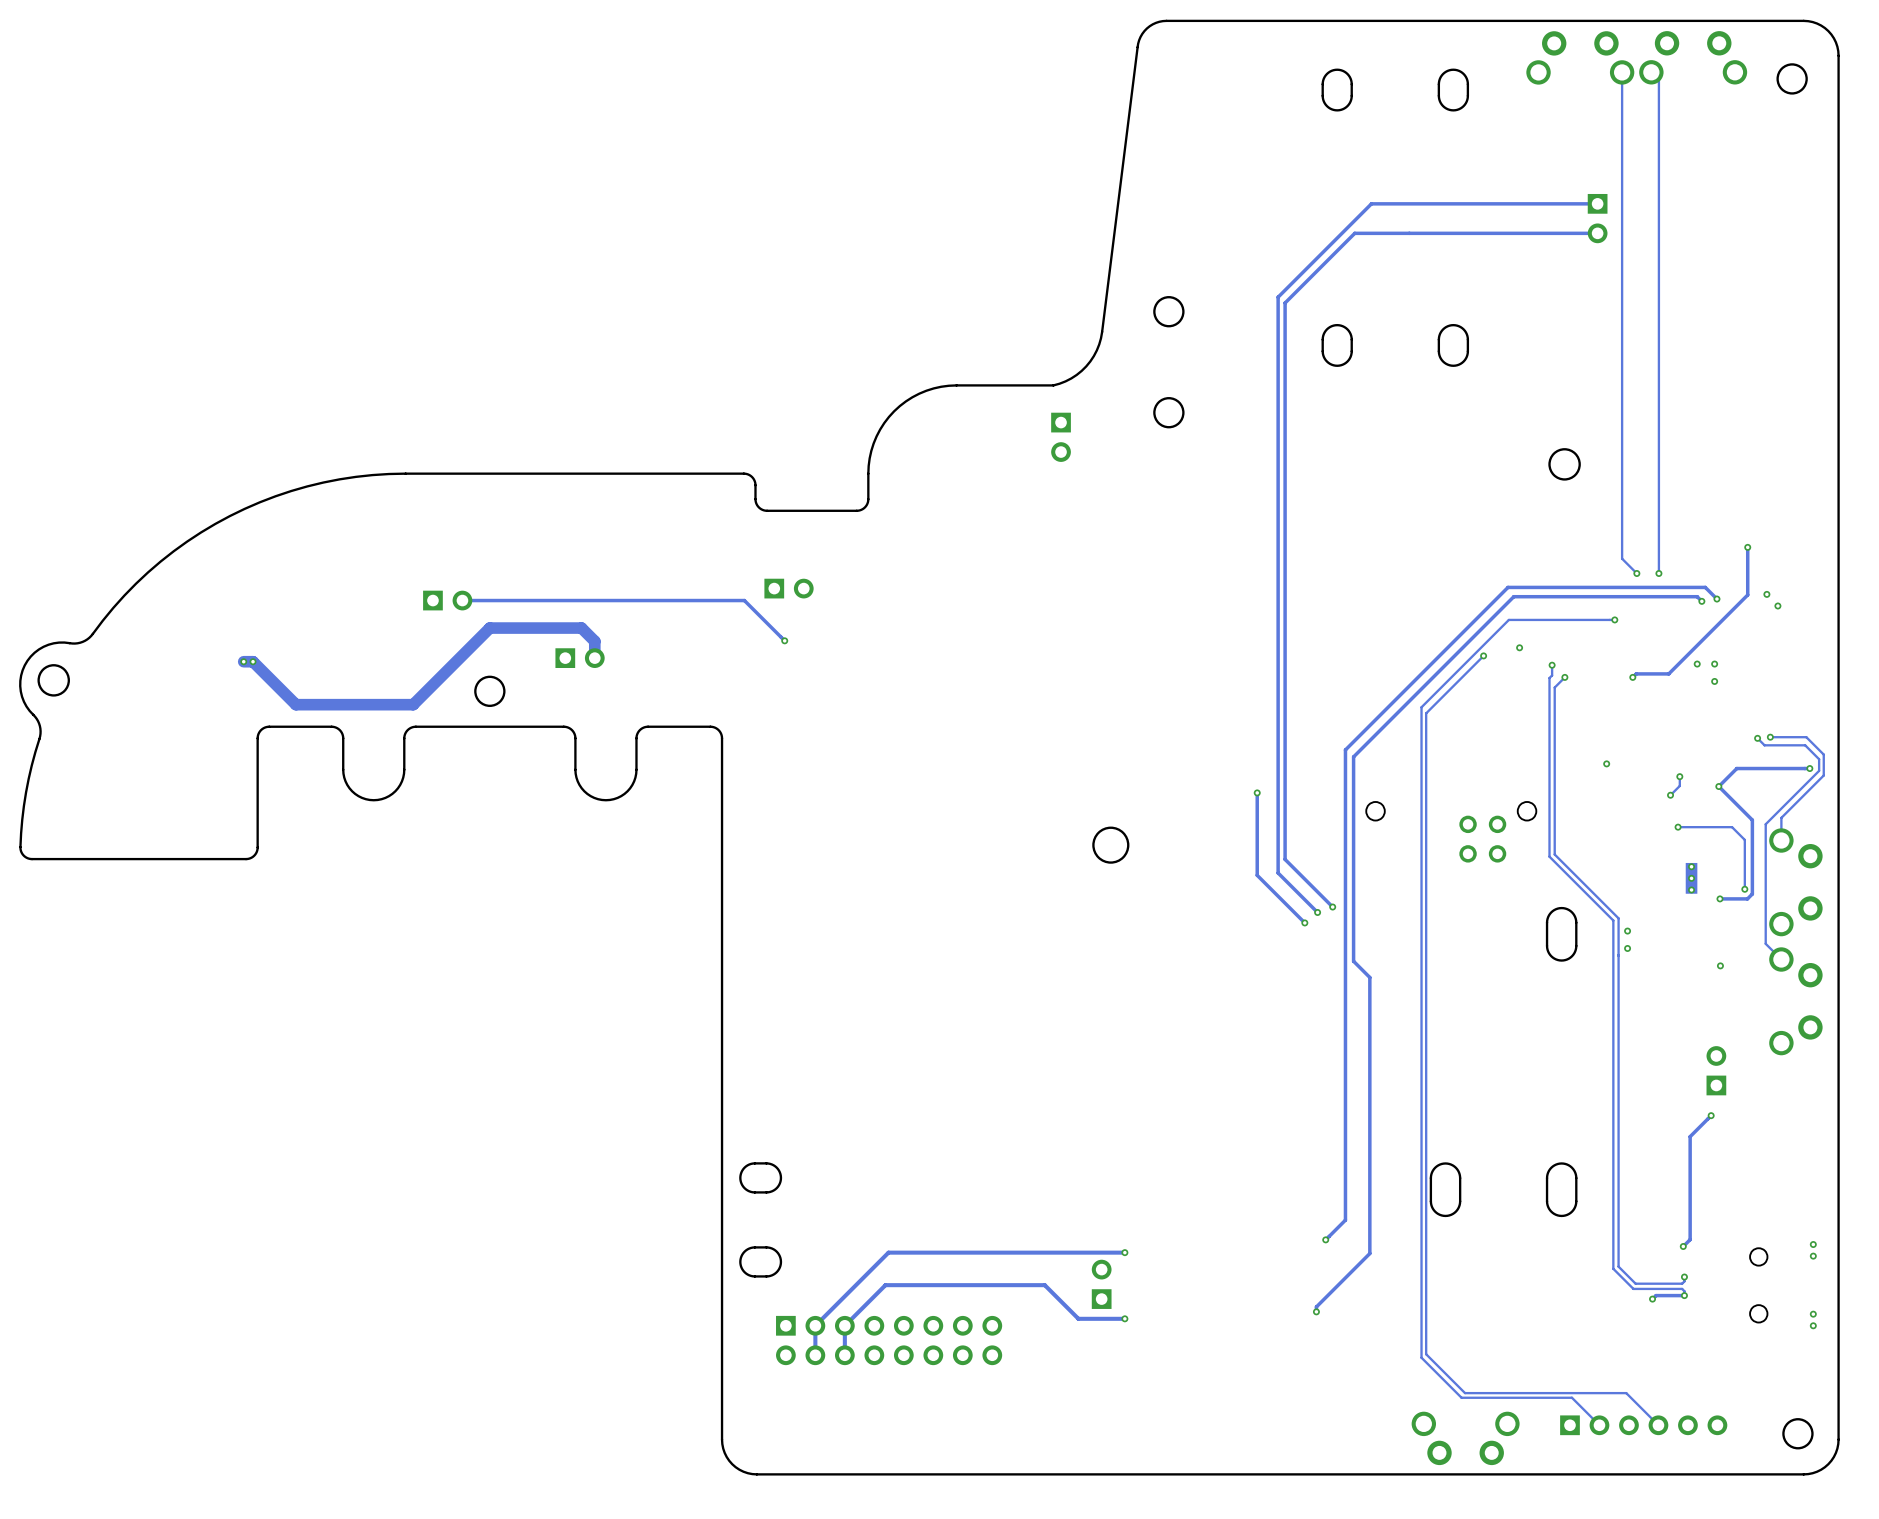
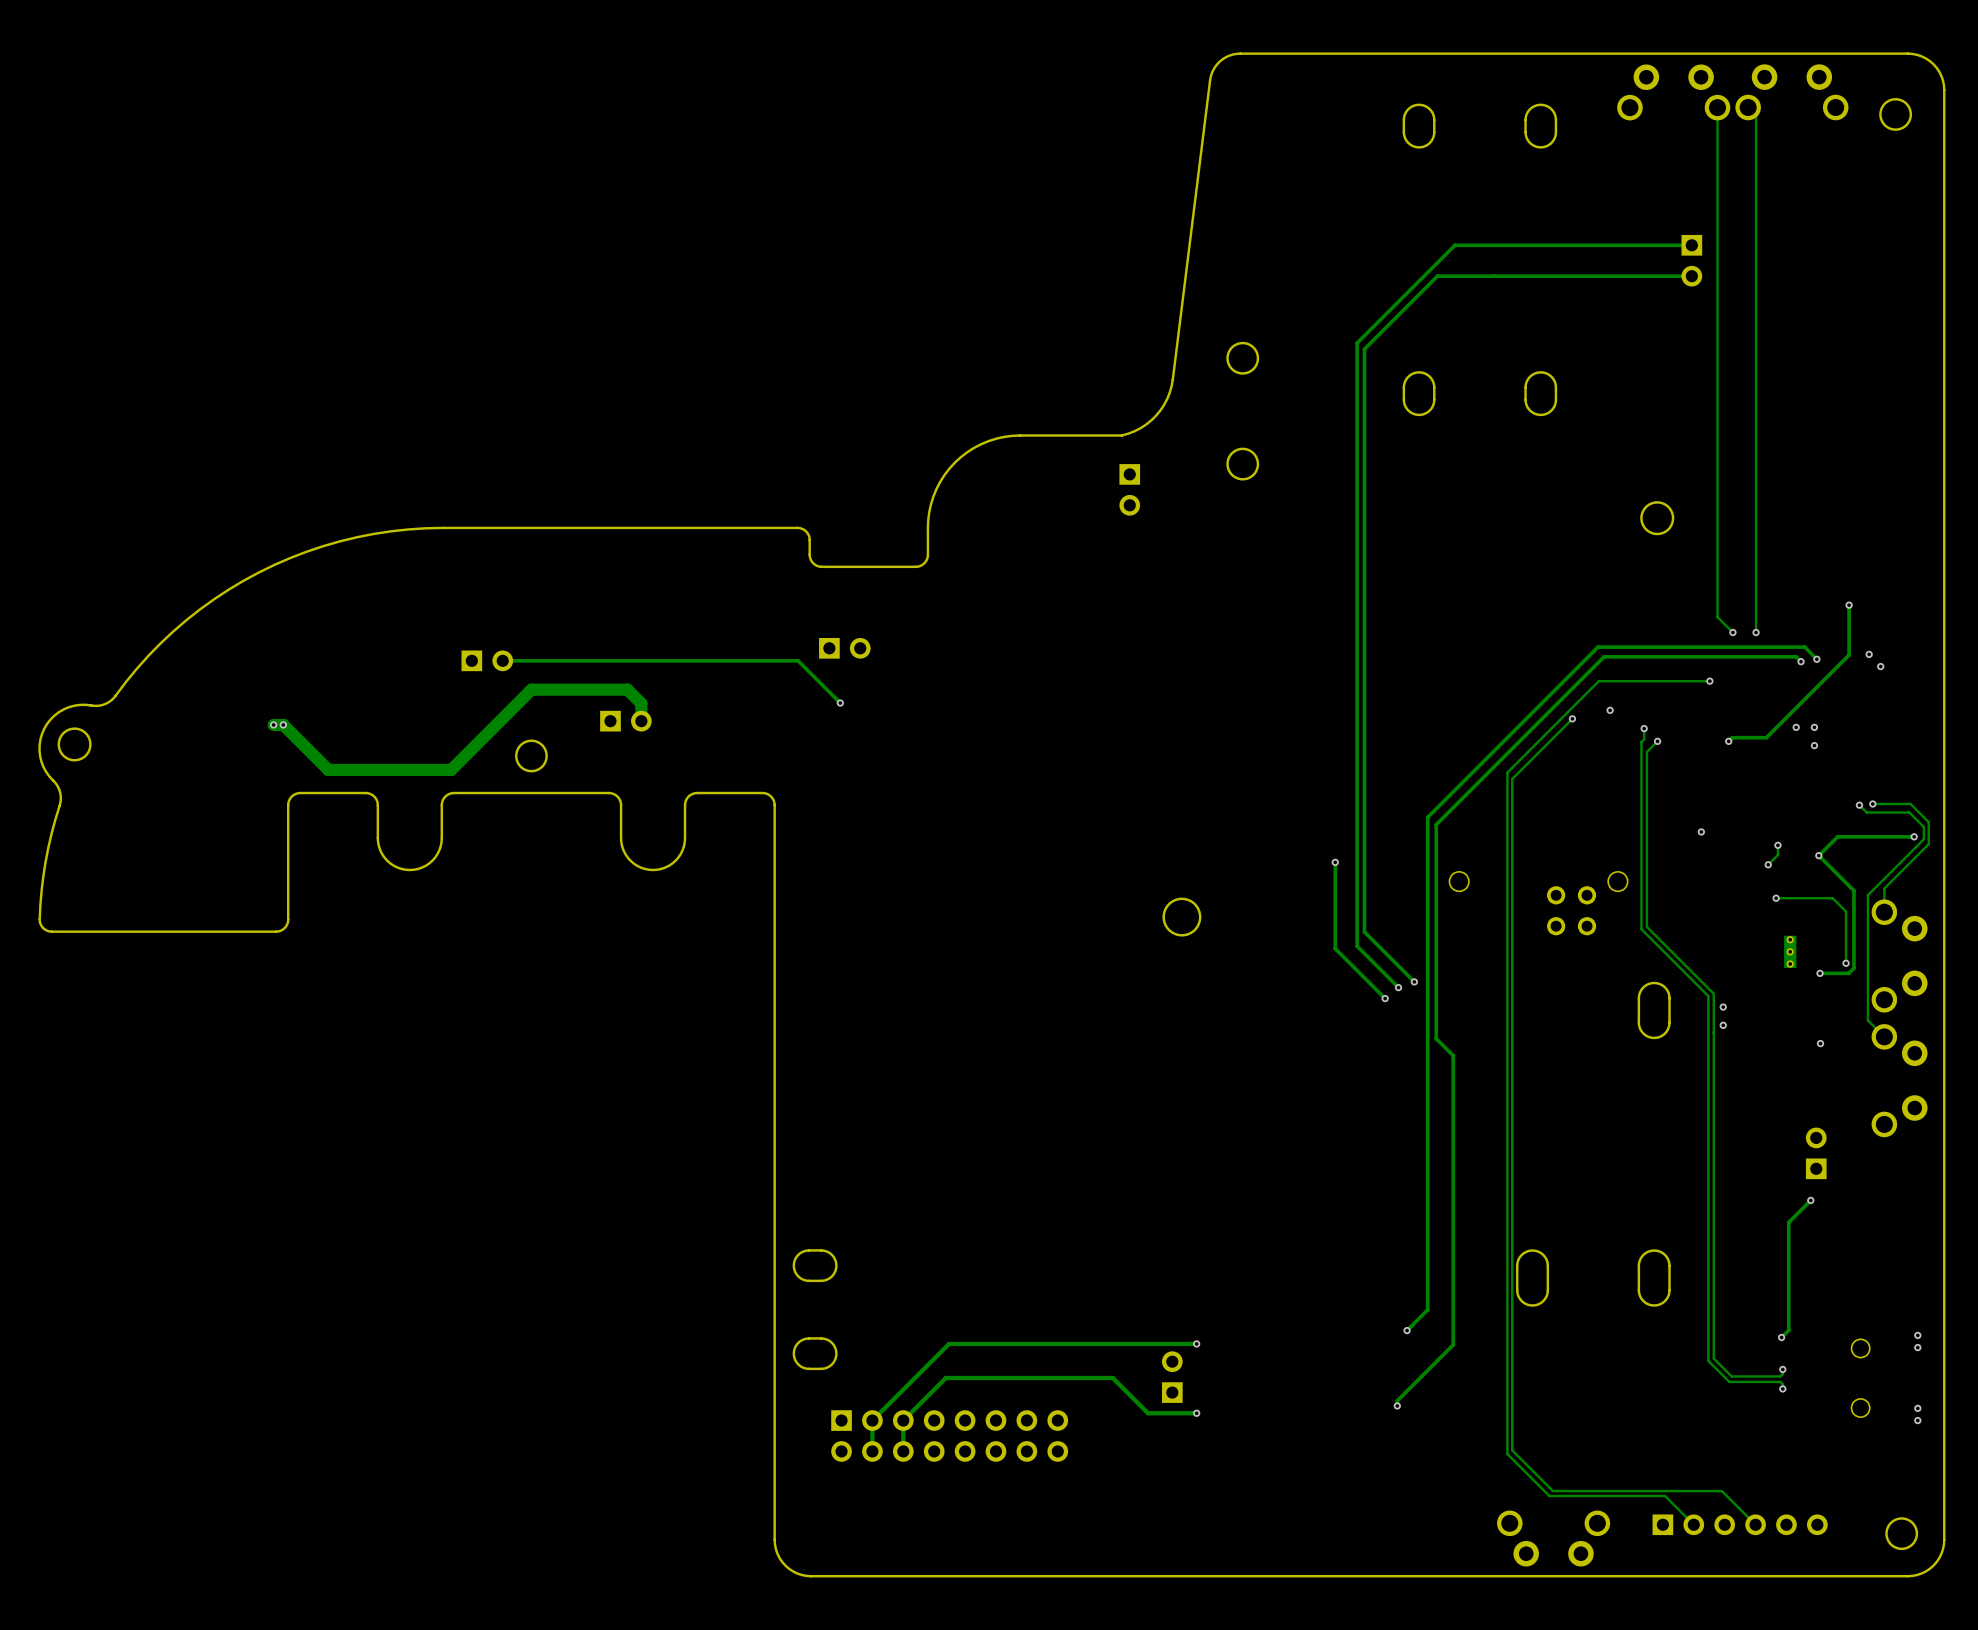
track: (1684, 1295) (1656, 1295) (1652, 1299) -> none
via: (1652, 1299) -> none

